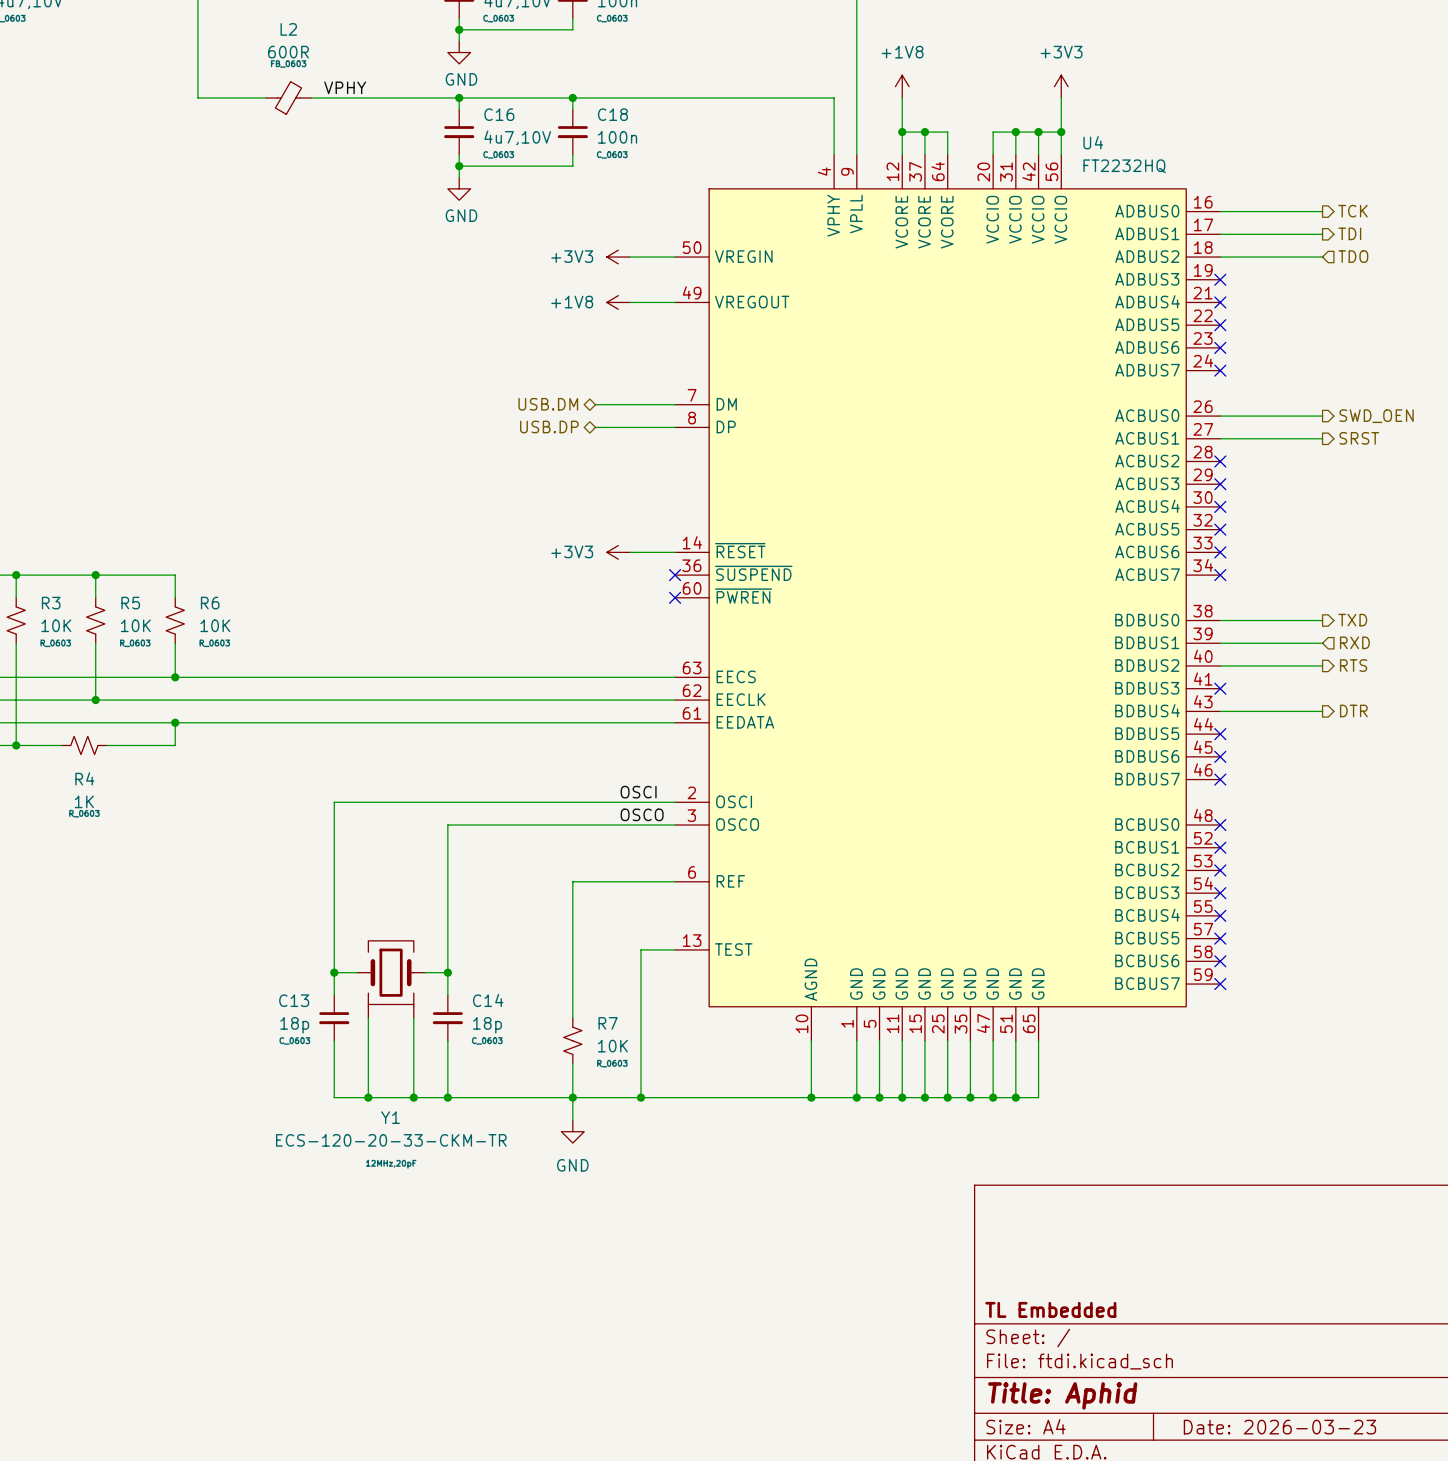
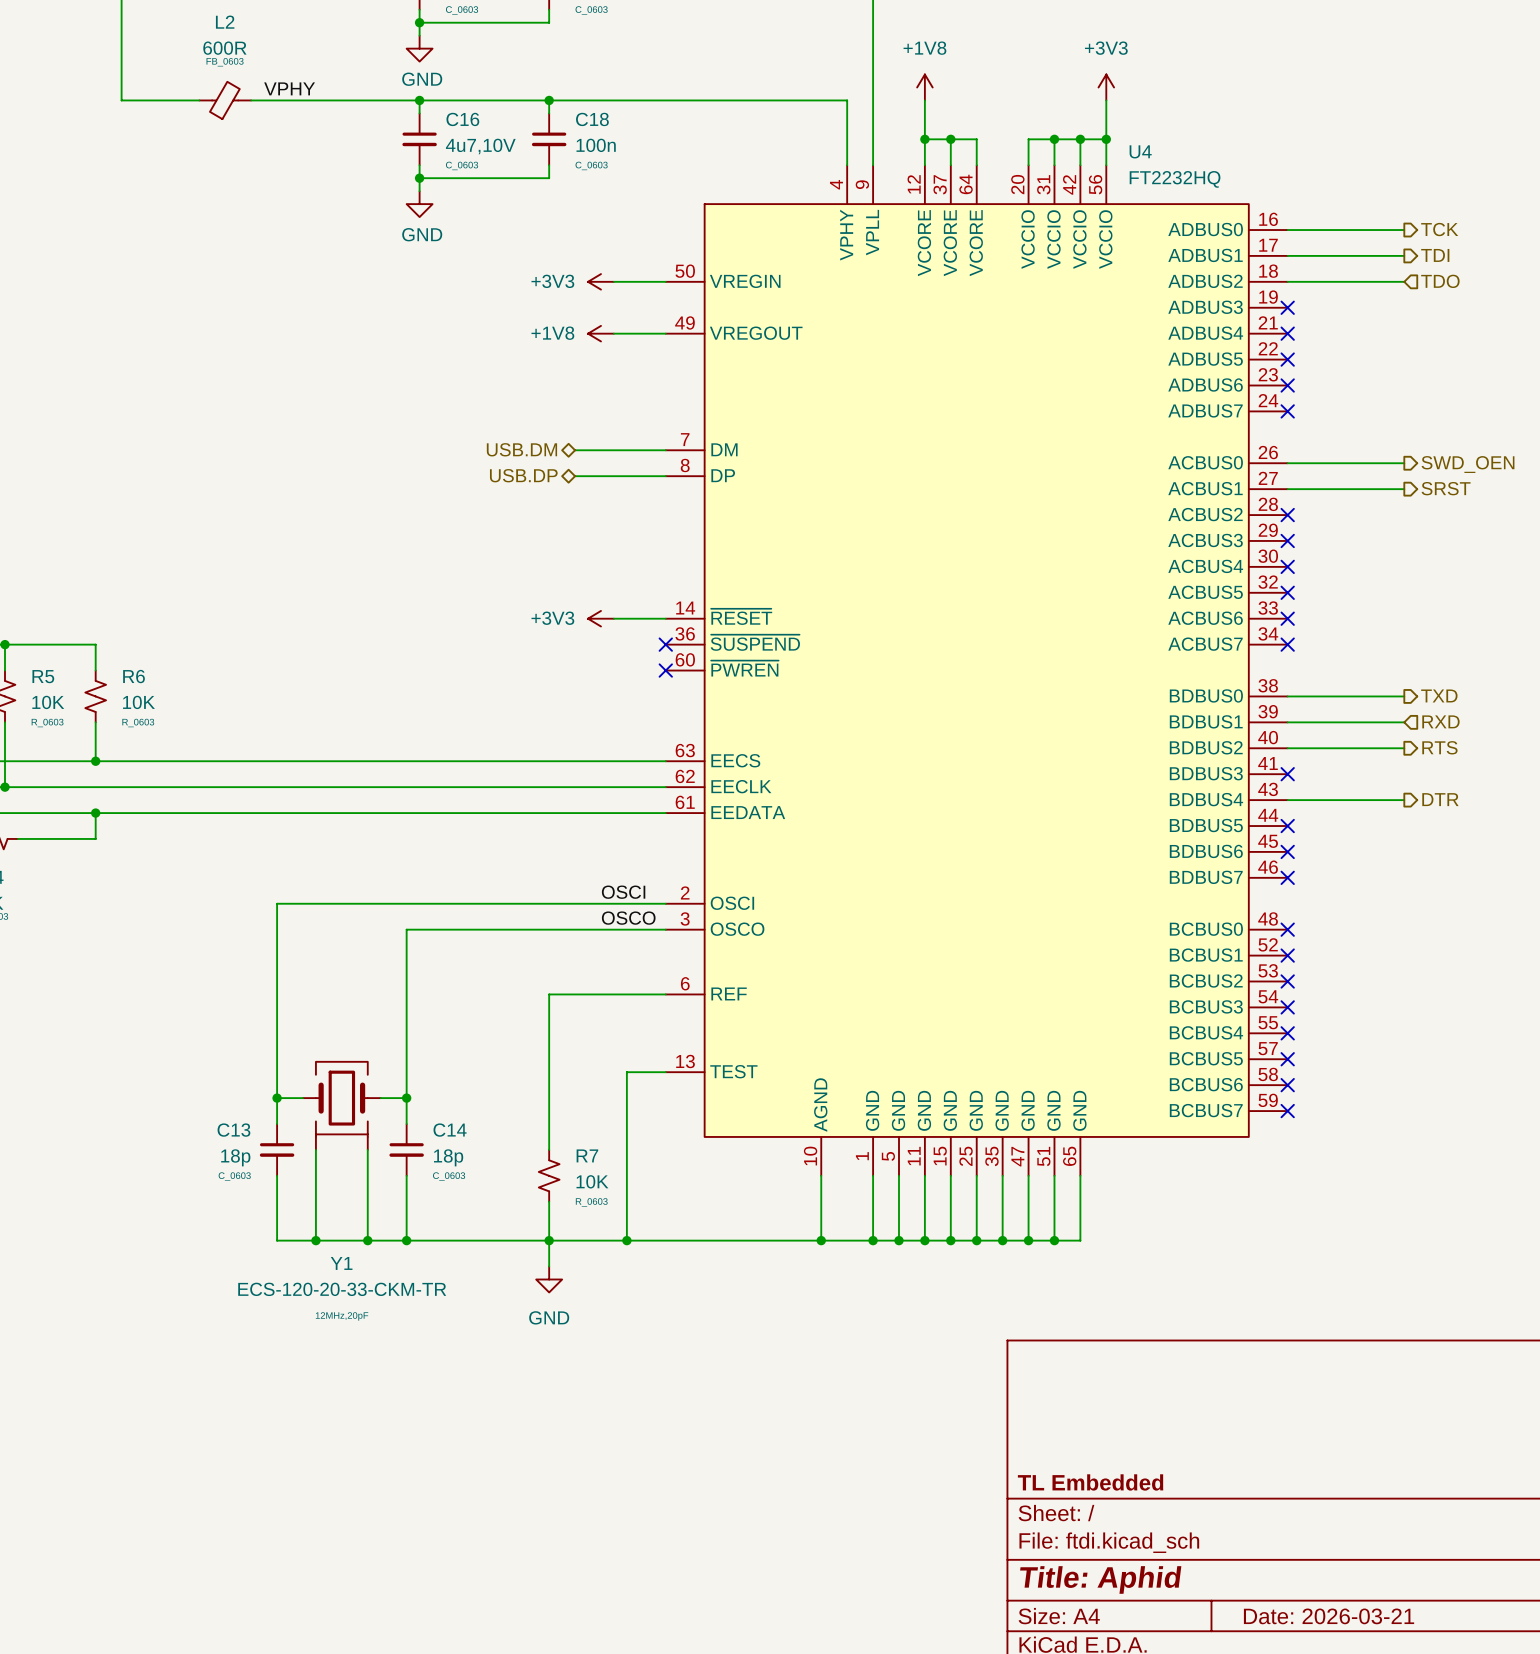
title block: Date: 2026-03-23 (1279, 1427) -> Date: 2026-03-21 (1329, 1616)

